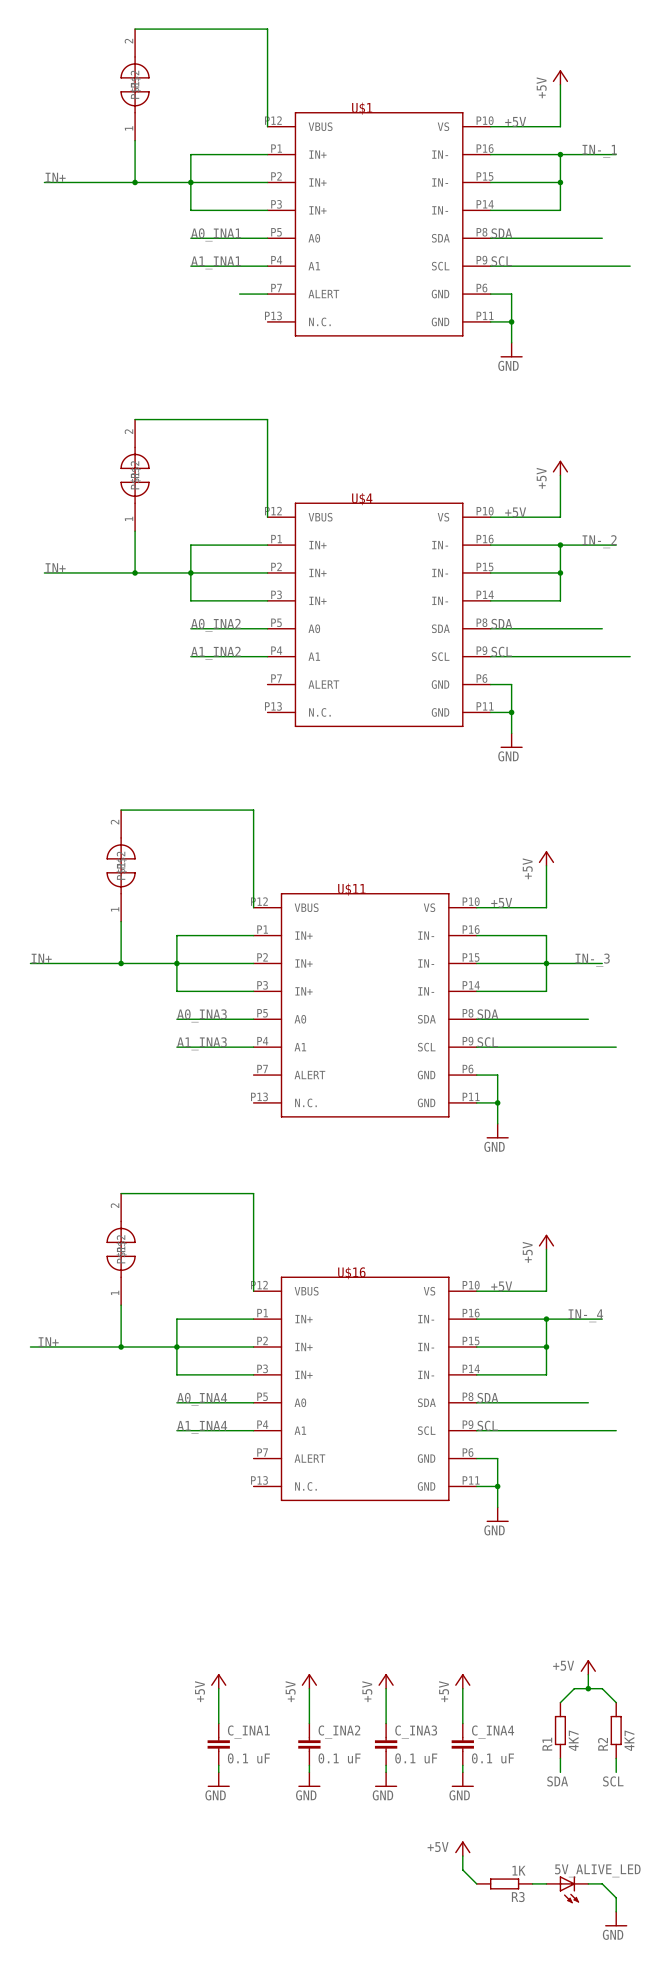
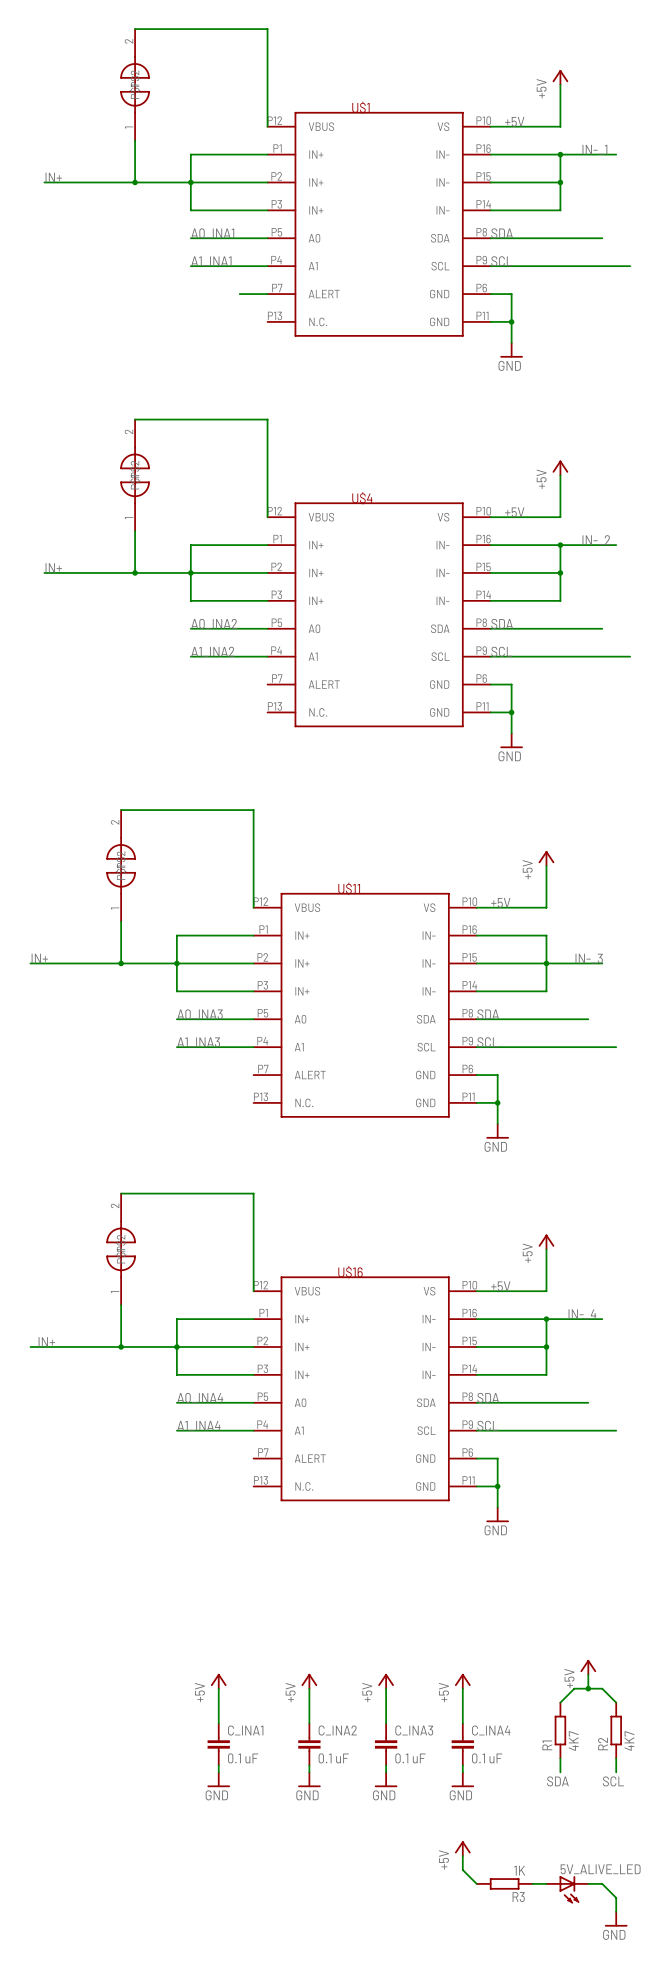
power symbol text rotation: 0° (563, 1665) -> 90° counterclockwise (569, 1678)
power symbol text rotation: 0° (438, 1847) -> 90° counterclockwise (444, 1859)

